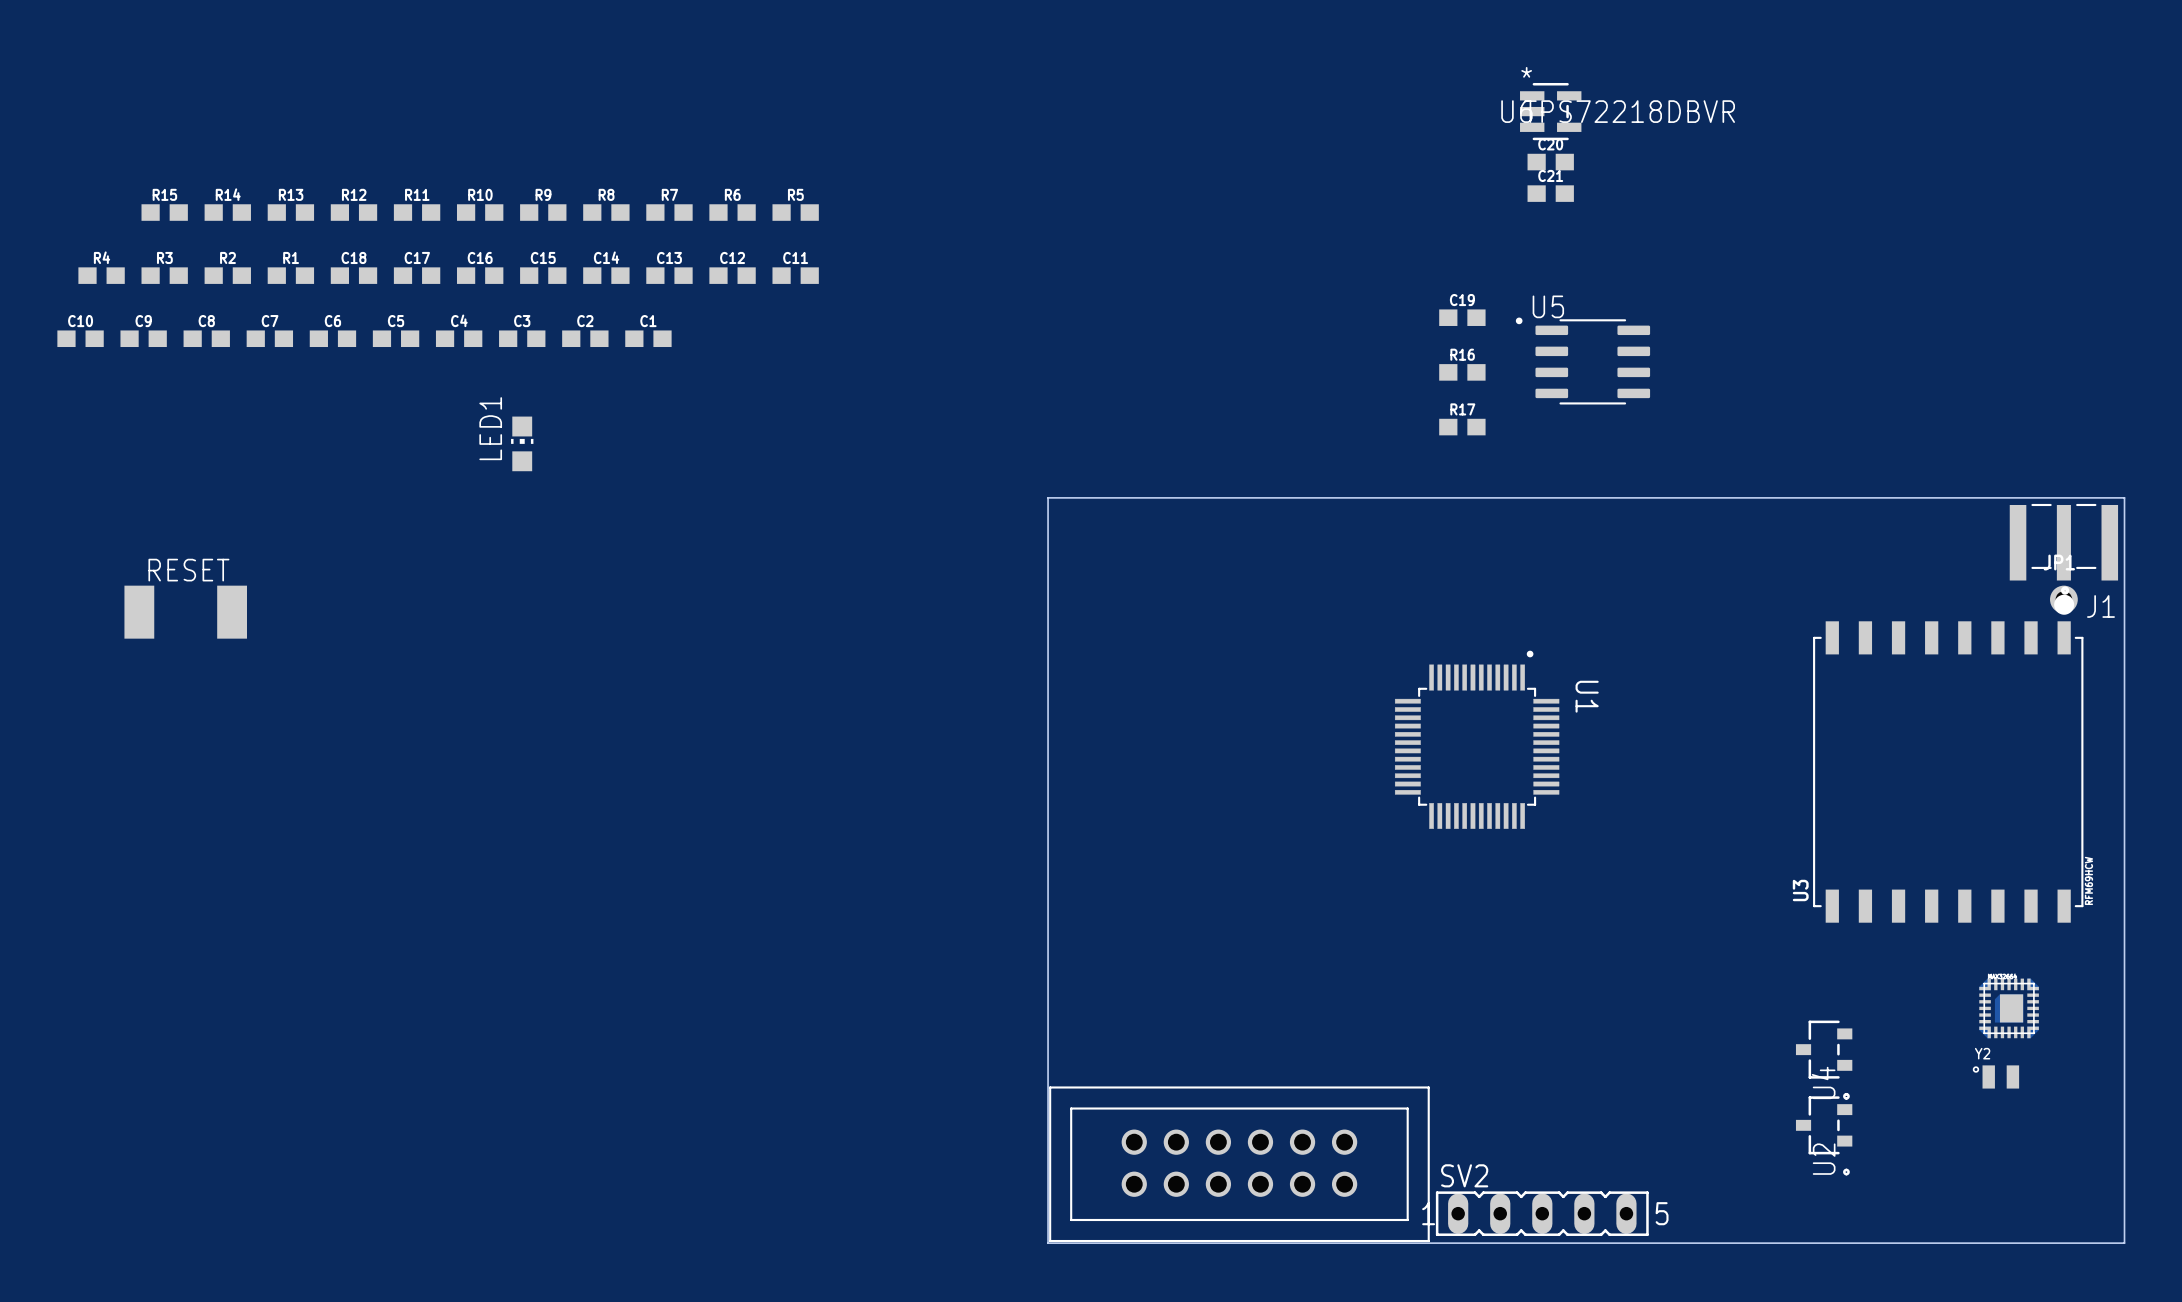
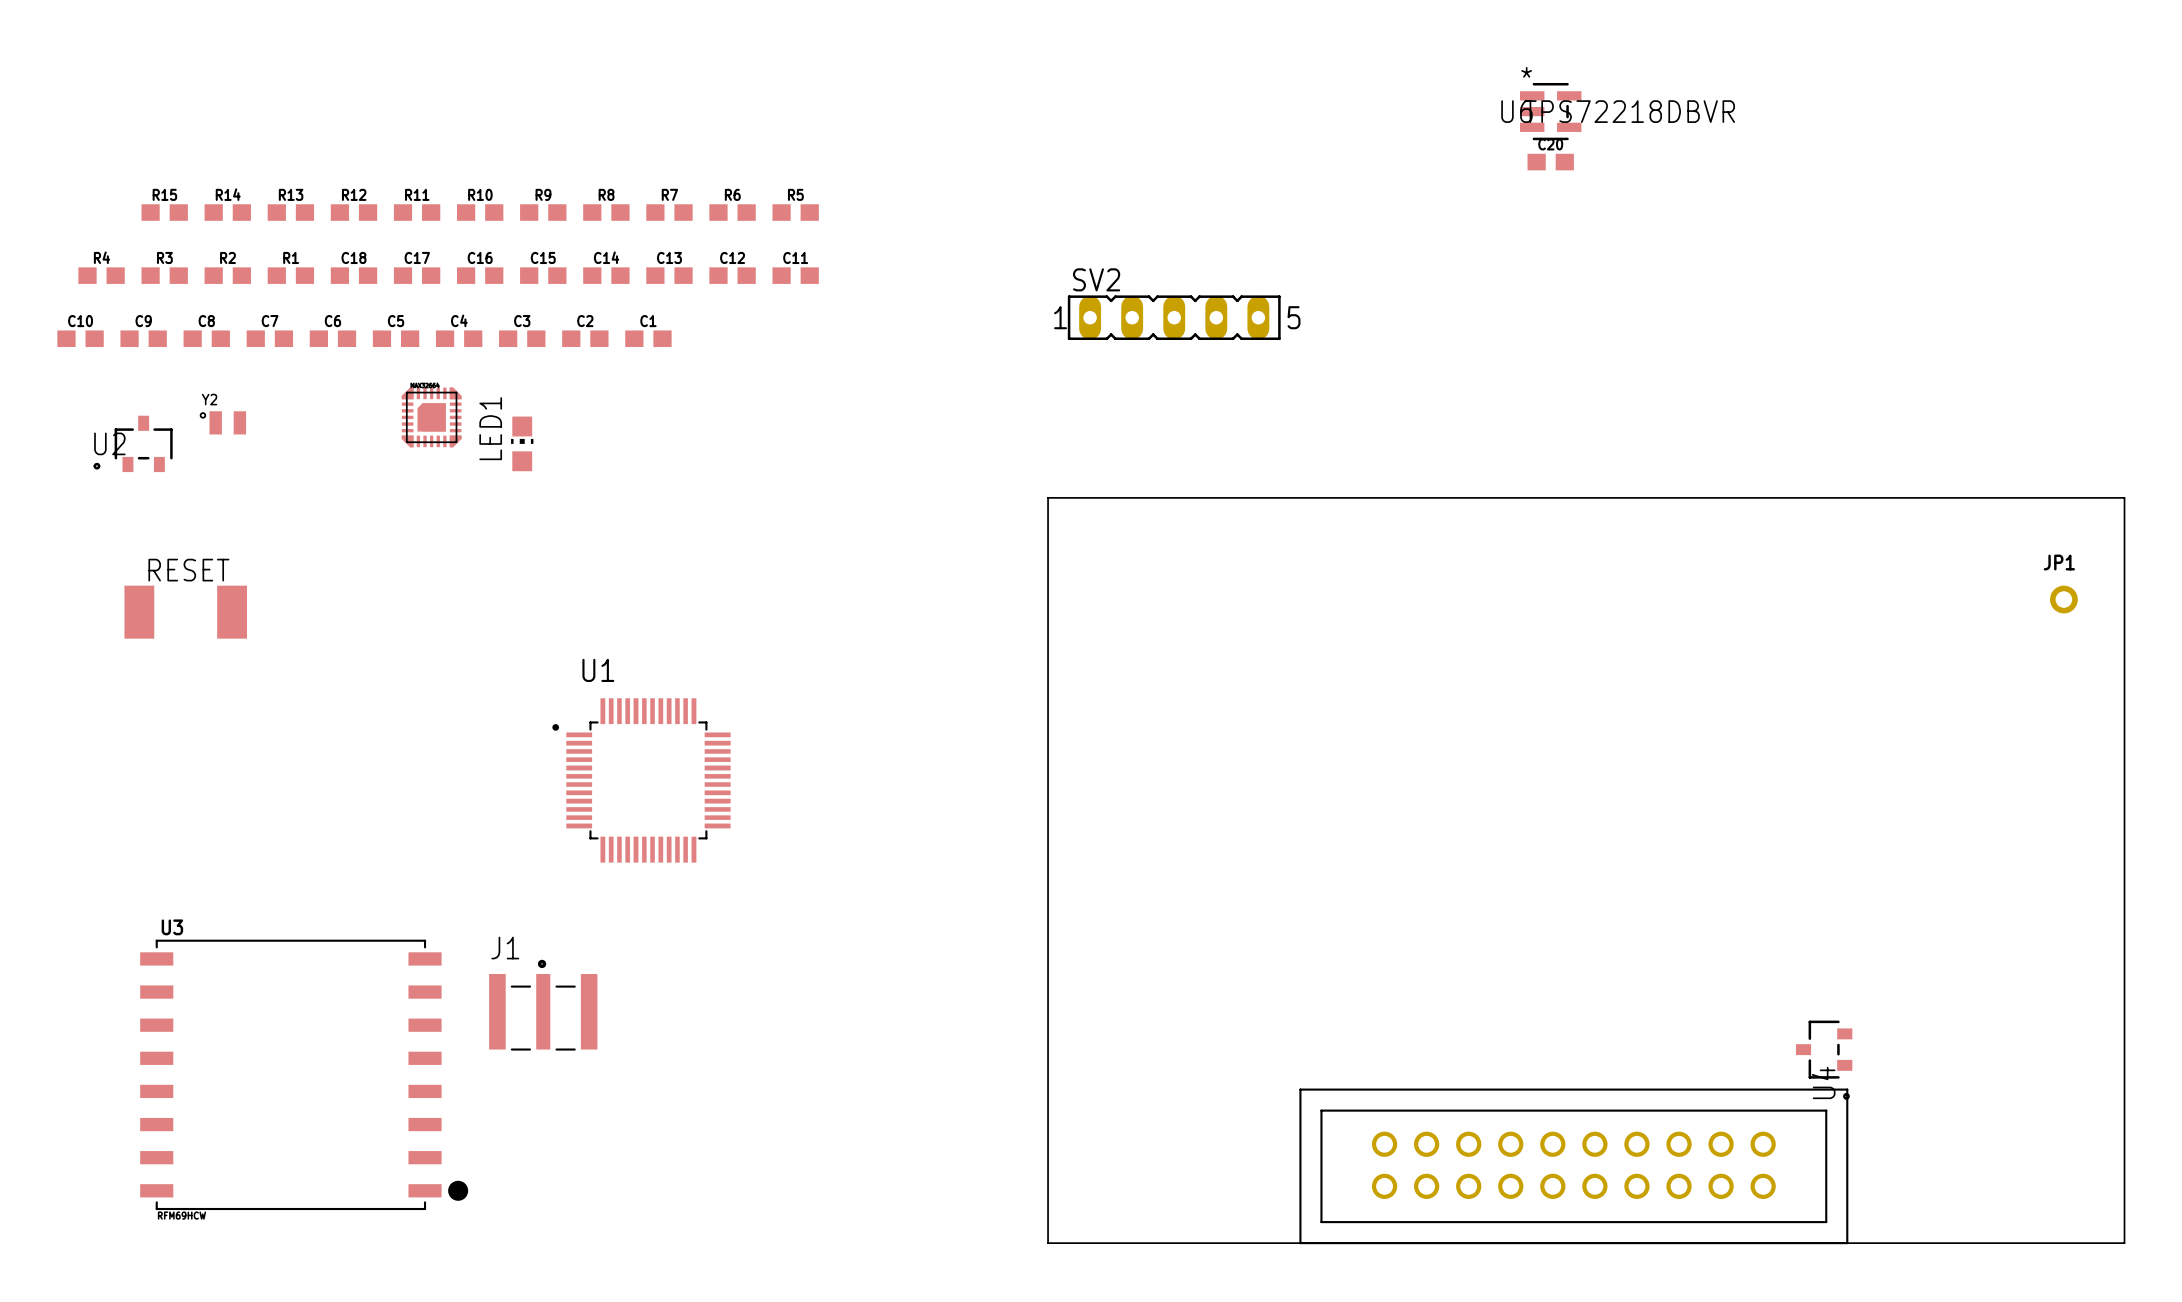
C21: (1550, 193) -> none
C19: (1462, 317) -> none
U5: (1582, 361) -> none
R16: (1462, 372) -> none
part: none -> (431, 417)
R17: (1462, 427) -> none
J1 rotation: 0° (2063, 549) -> 180° (543, 1005)
J1 position: (2063, 549) -> (543, 1005)
U1 rotation: 0° (1477, 739) -> 90° counterclockwise (641, 780)
U1 position: (1477, 739) -> (641, 780)
U3 rotation: 0° (1948, 758) -> 90° clockwise (304, 1074)
U3 position: (1948, 758) -> (304, 1074)
part: (2009, 1008) -> none
Y2 position: (1996, 1076) -> (223, 422)
U2 rotation: 0° (1824, 1135) -> 90° clockwise (133, 443)
U2 position: (1824, 1135) -> (133, 443)
part: (1239, 1164) -> none
part: none -> (1573, 1166)
SV2 footprint: [1435, 1191, 1649, 1236] -> [1067, 295, 1281, 340]

